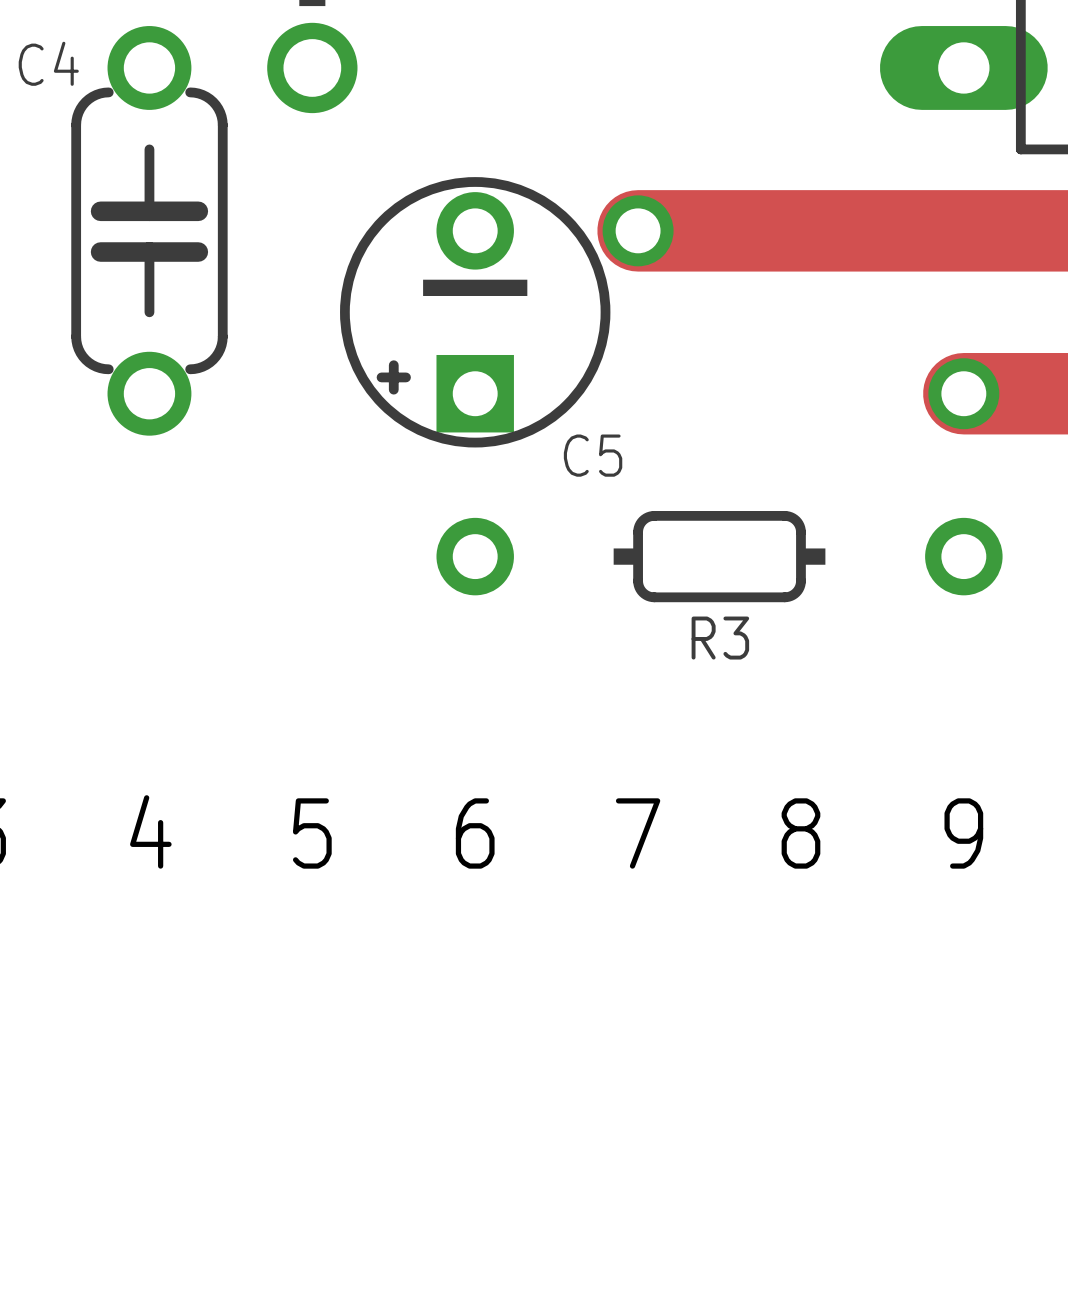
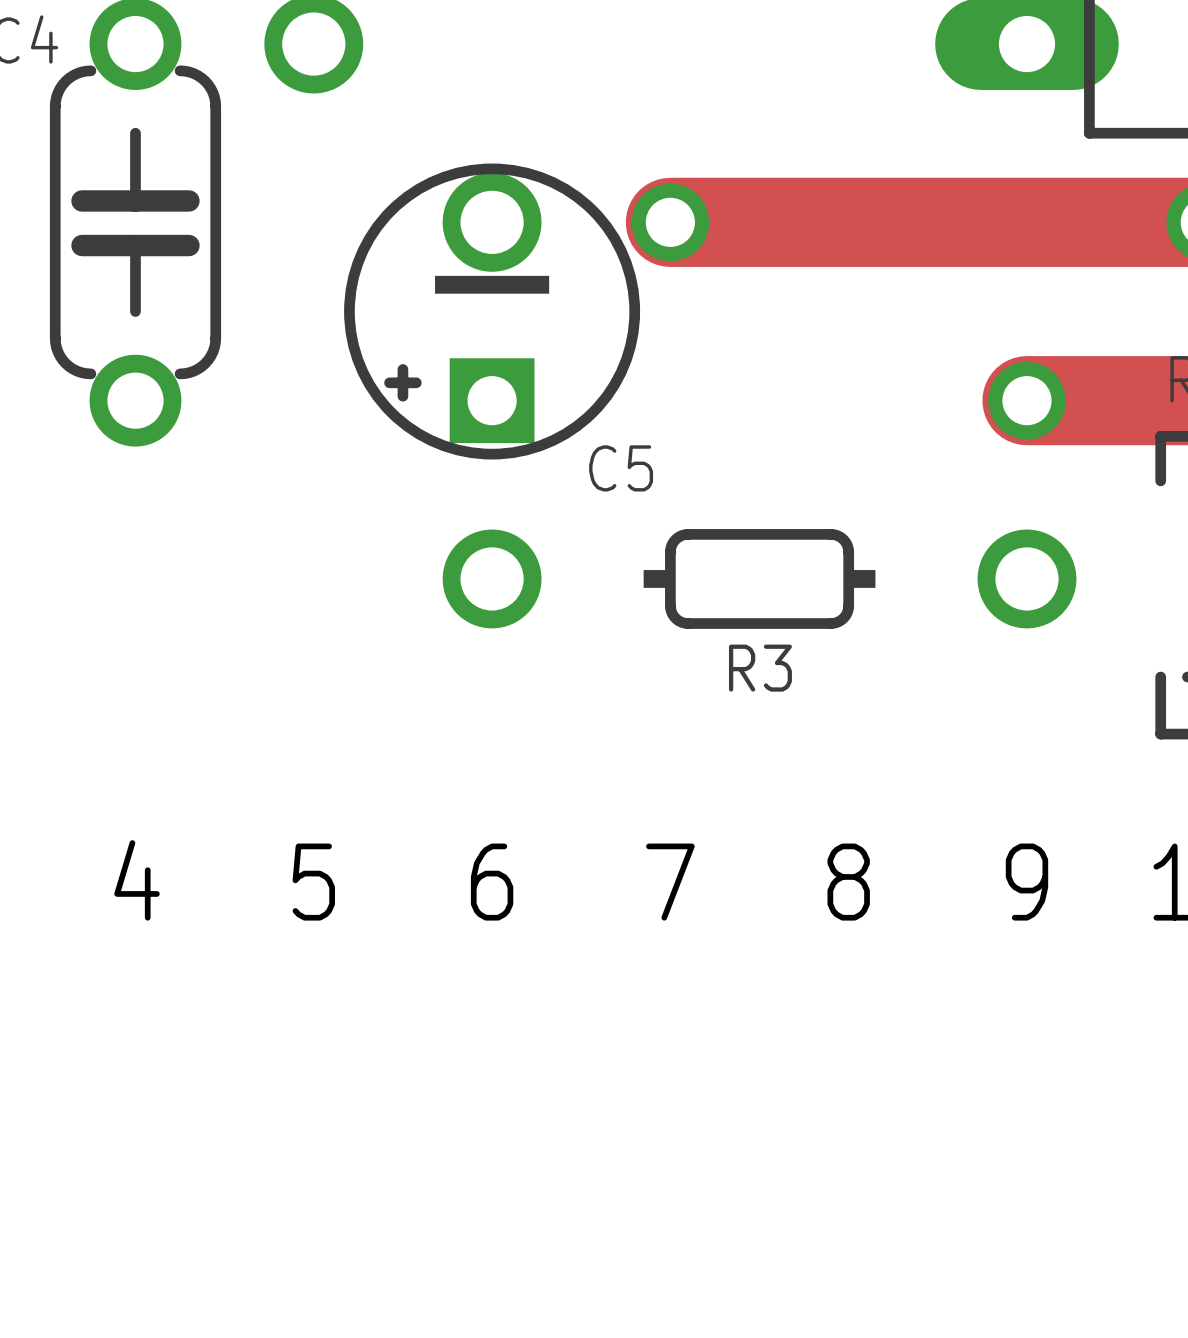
C5 footprint: [340, 177, 611, 448] -> [344, 163, 641, 460]
R3 footprint: [436, 510, 1003, 603] -> [442, 529, 1077, 629]

